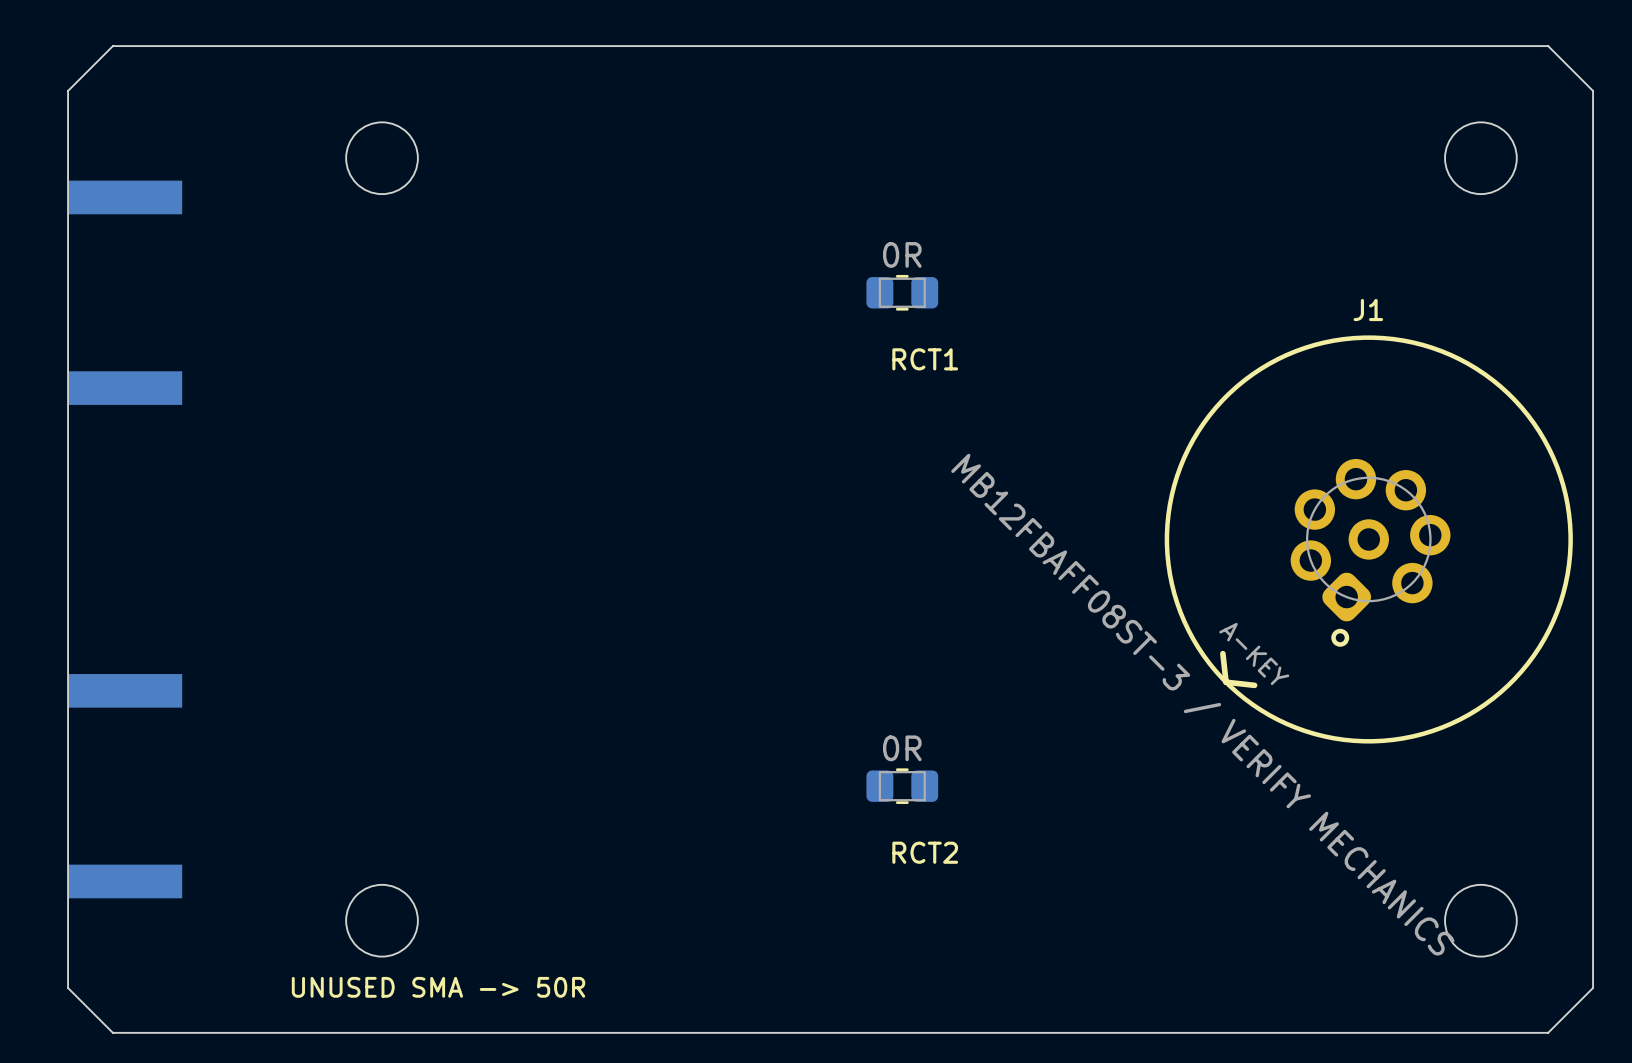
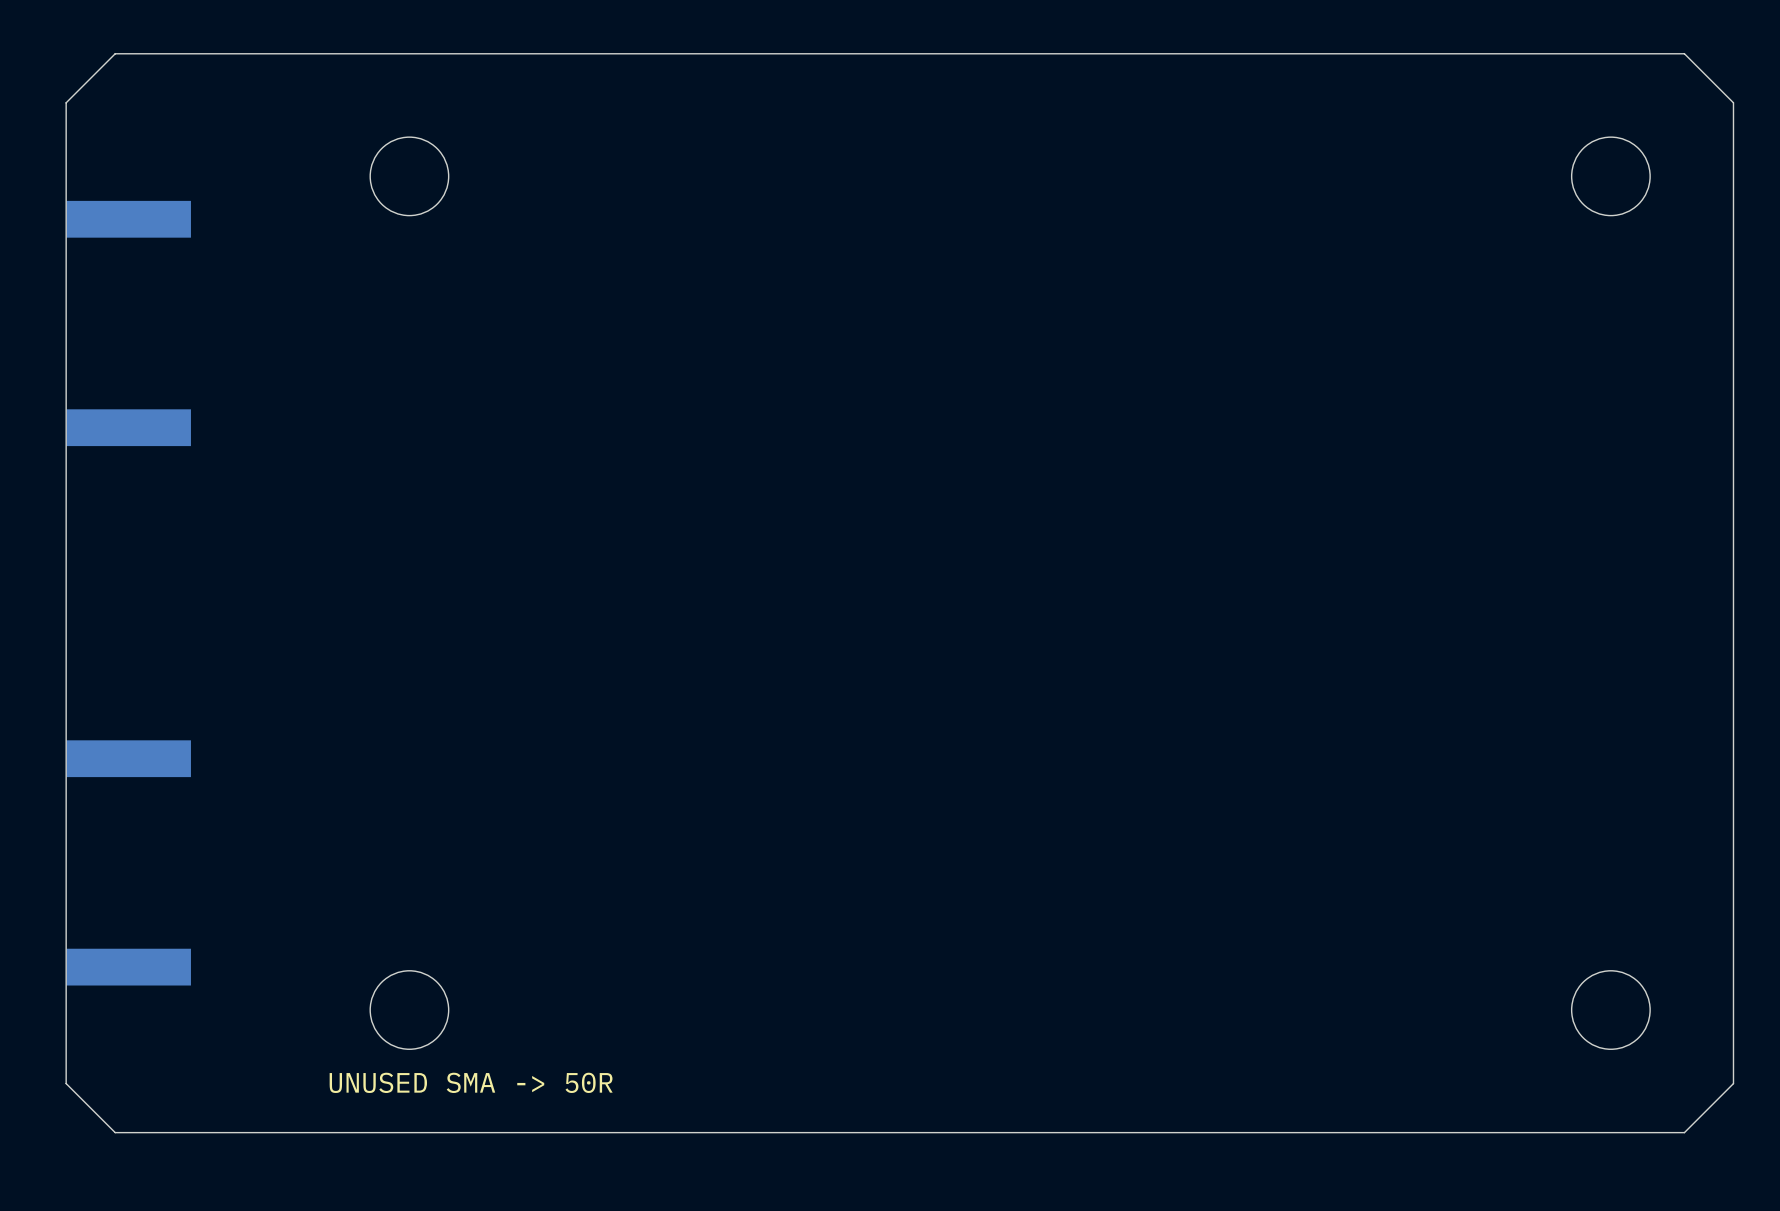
RCT1: 0R (902, 292) -> none
J1: MB12FBAFF08ST-3 / VERIFY MECHANICS (1368, 539) -> none
RCT2: 0R (902, 786) -> none

